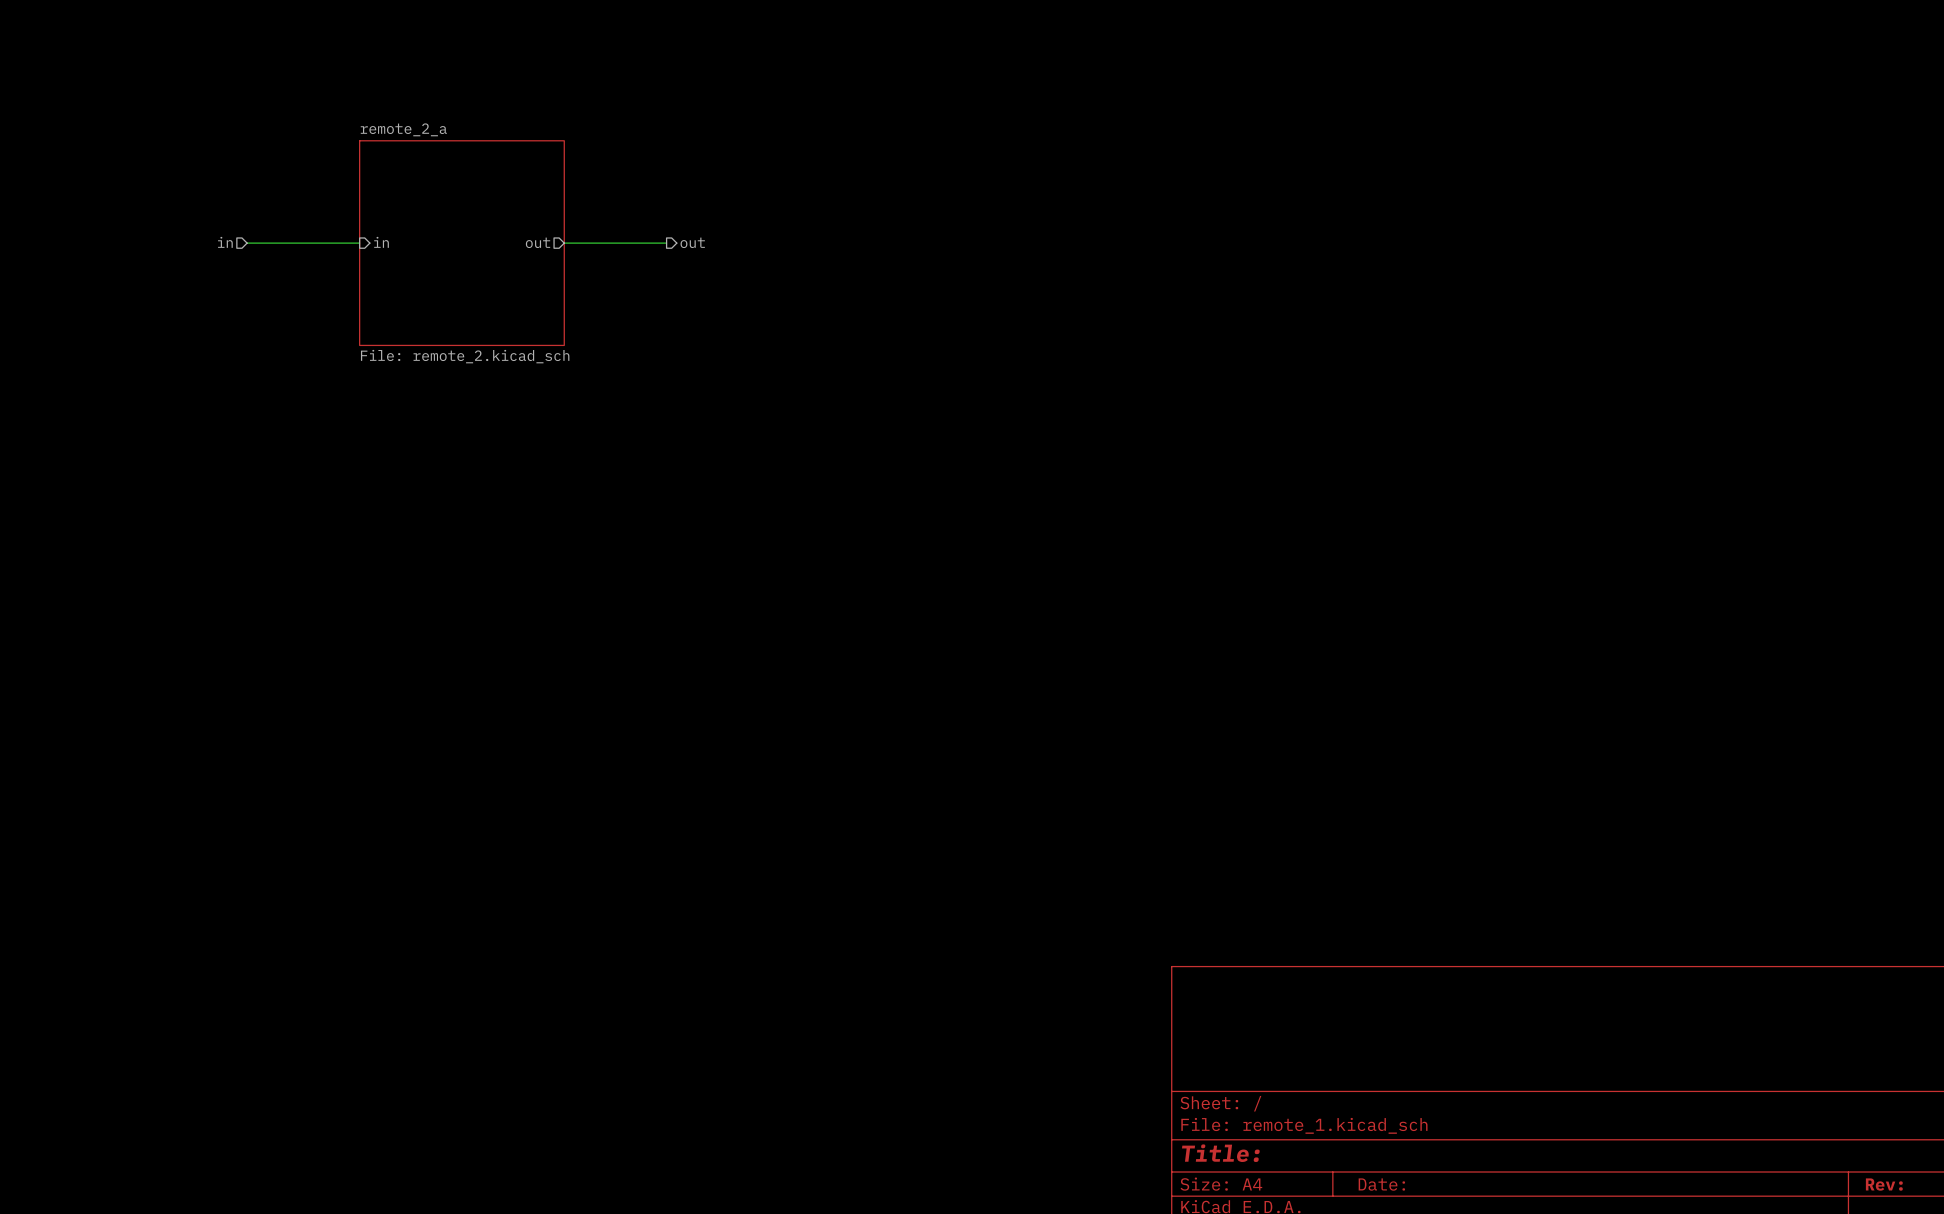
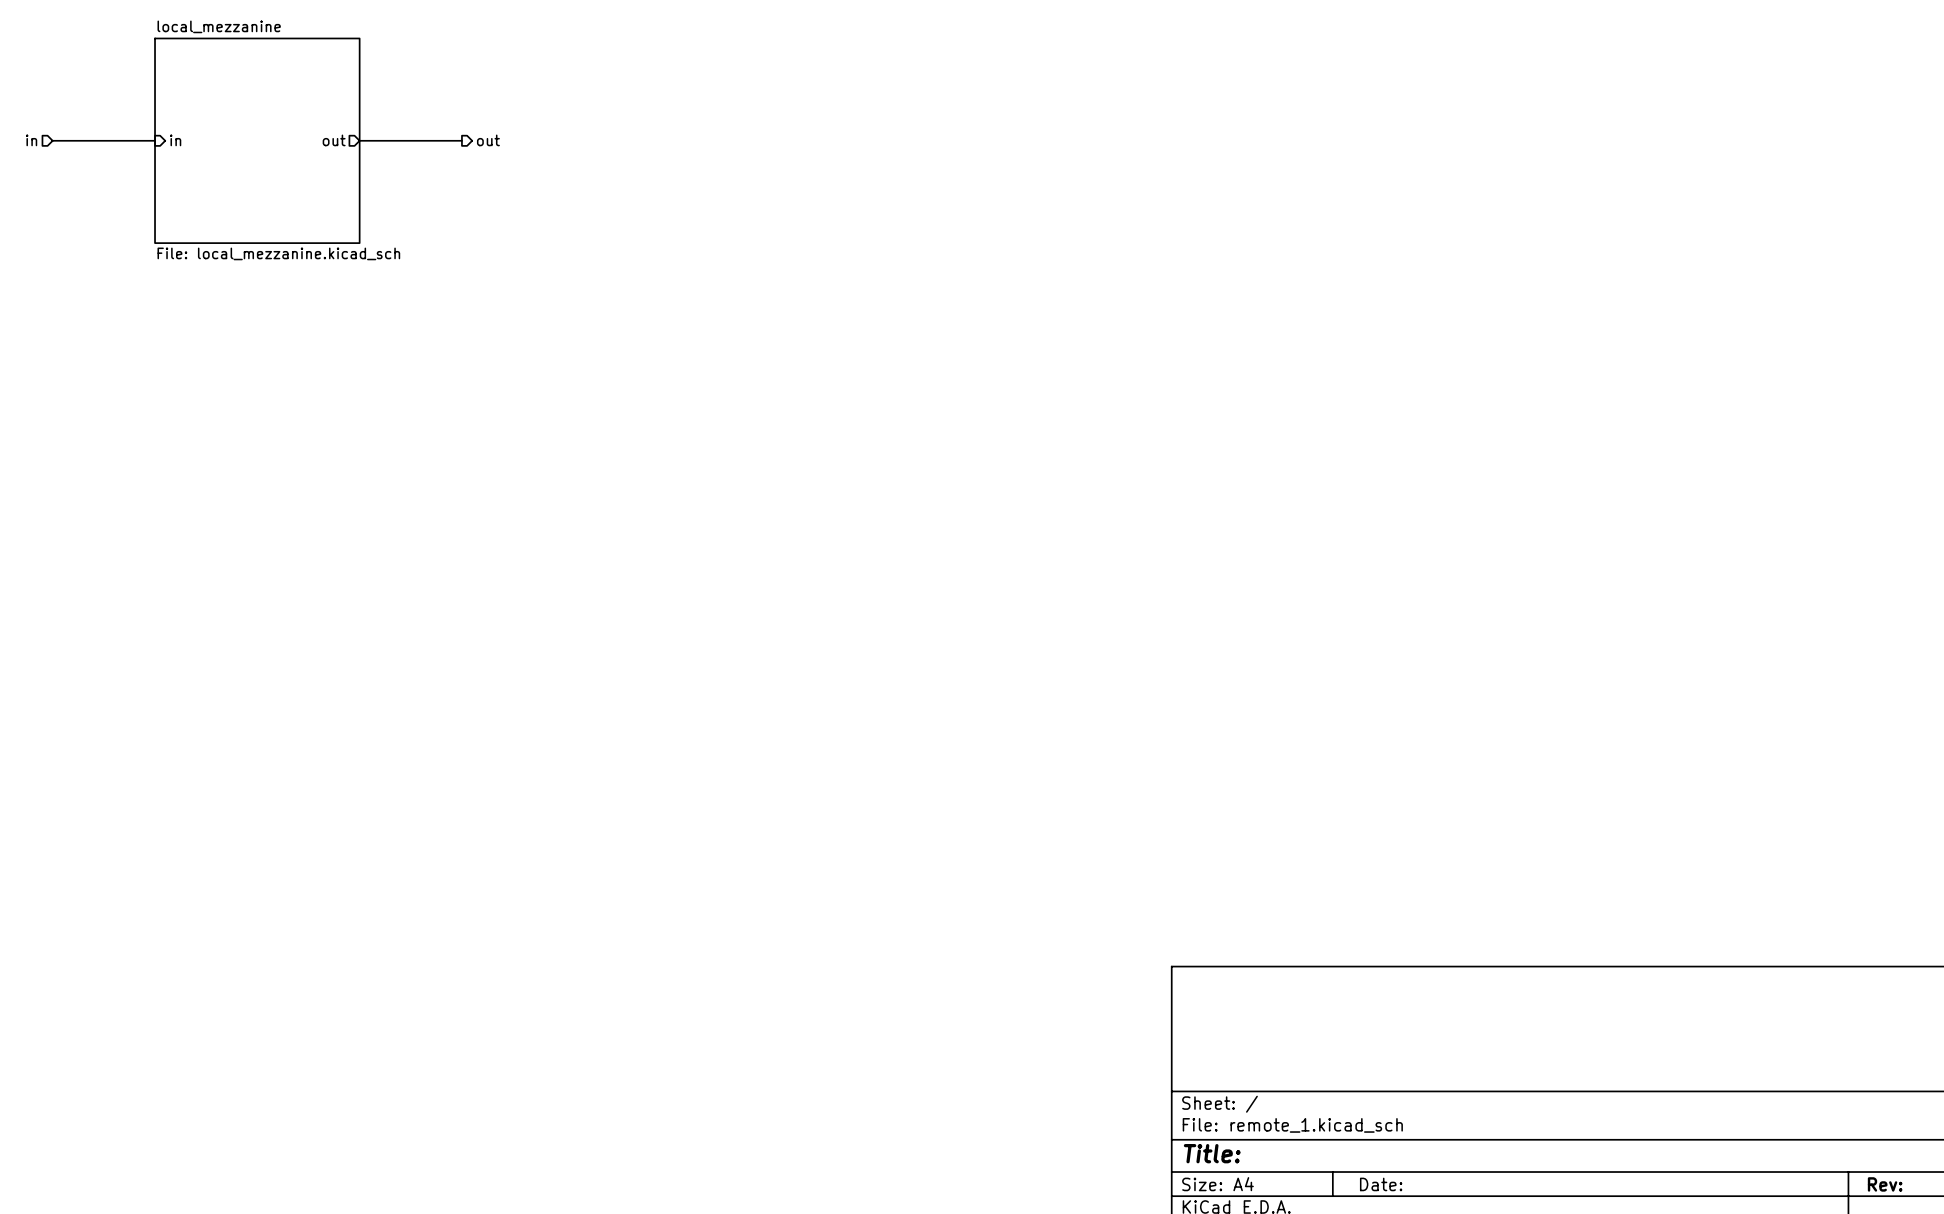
hierarchical label: none -> in (31, 140)
wire: none -> (52, 140) (155, 140)
sheet pin: none -> in (175, 140)
sheet local_mezzanine: none -> File: local_mezzanine.kicad_sch (257, 140)
sheet pin: none -> out (334, 140)
hierarchical label: none -> out (488, 140)
hierarchical label: in (225, 242) -> none
sheet pin: in (381, 242) -> none
sheet pin: out (538, 242) -> none
hierarchical label: out (692, 242) -> none
sheet remote_2_a: File: remote_2.kicad_sch (461, 243) -> none
wire: (564, 243) (666, 243) -> none

